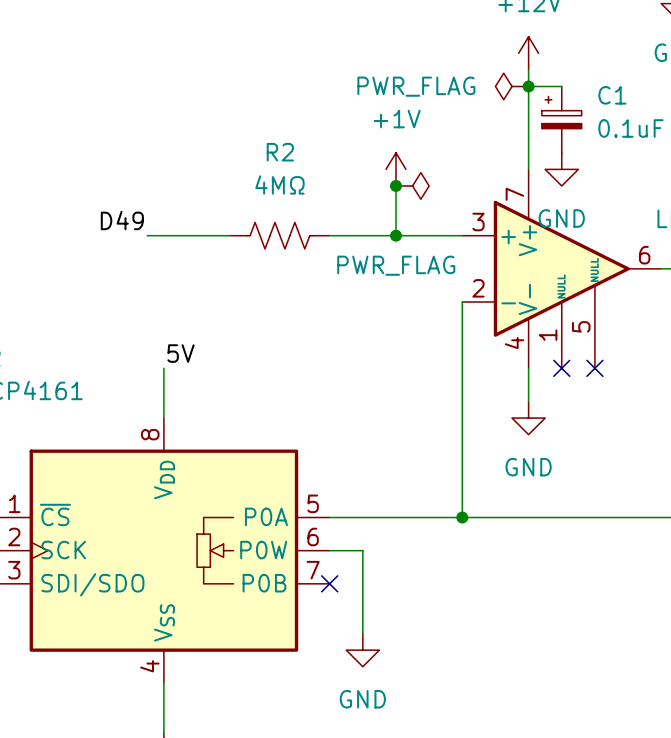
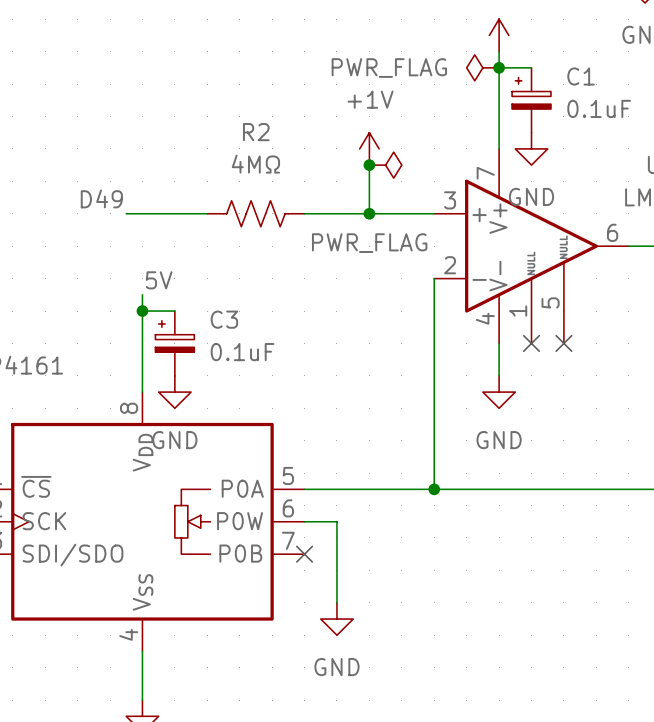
wire: none -> (142, 294) (142, 343)
wire: none -> (142, 311) (174, 311)
junction: none -> (142, 311)
label position: 5V (181, 353) -> 5V (159, 280)
C3: none -> 0.1uF (174, 343)
power symbol: none -> GND (174, 392)

